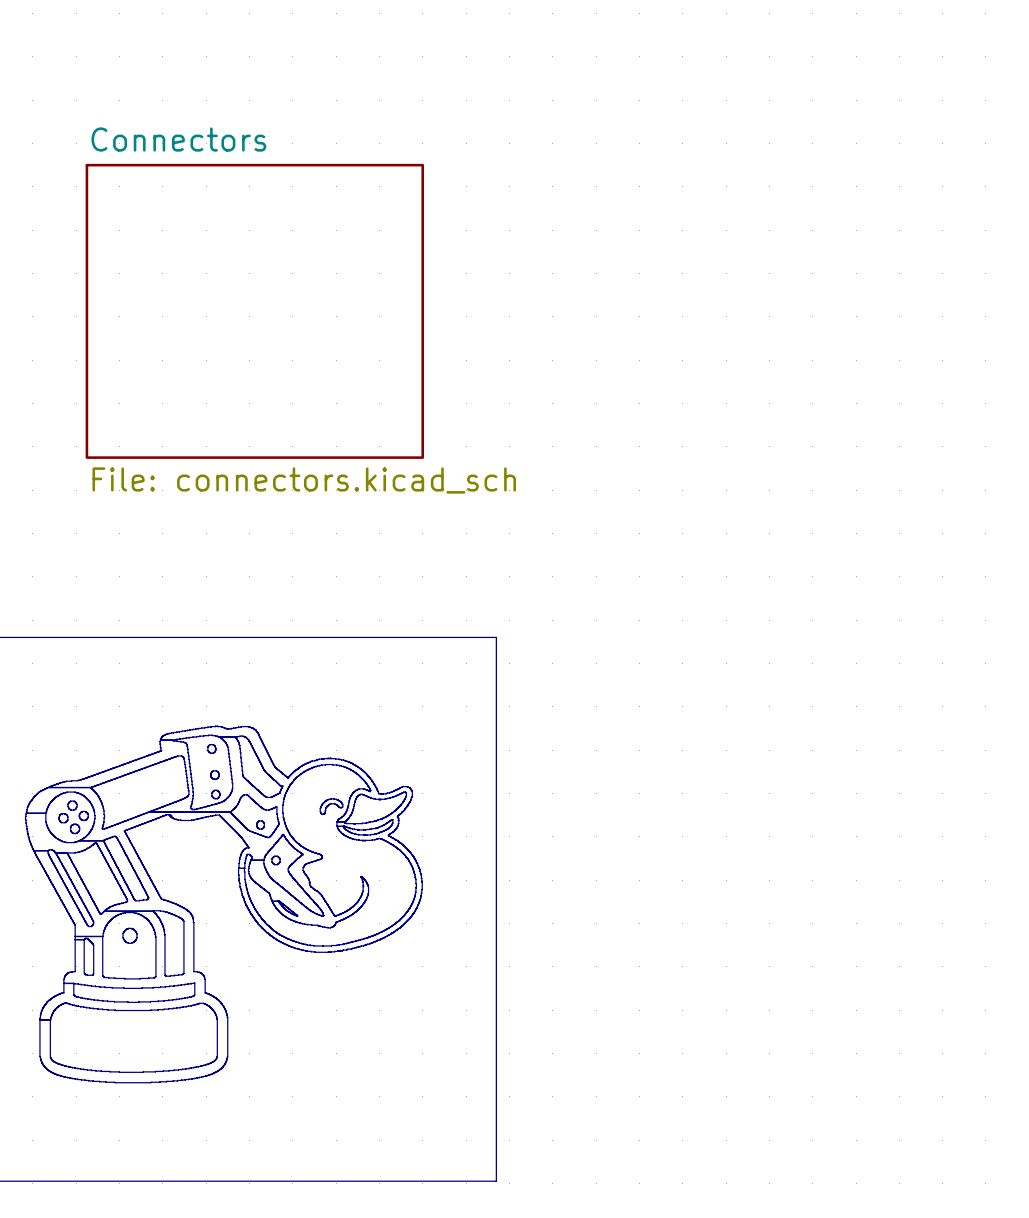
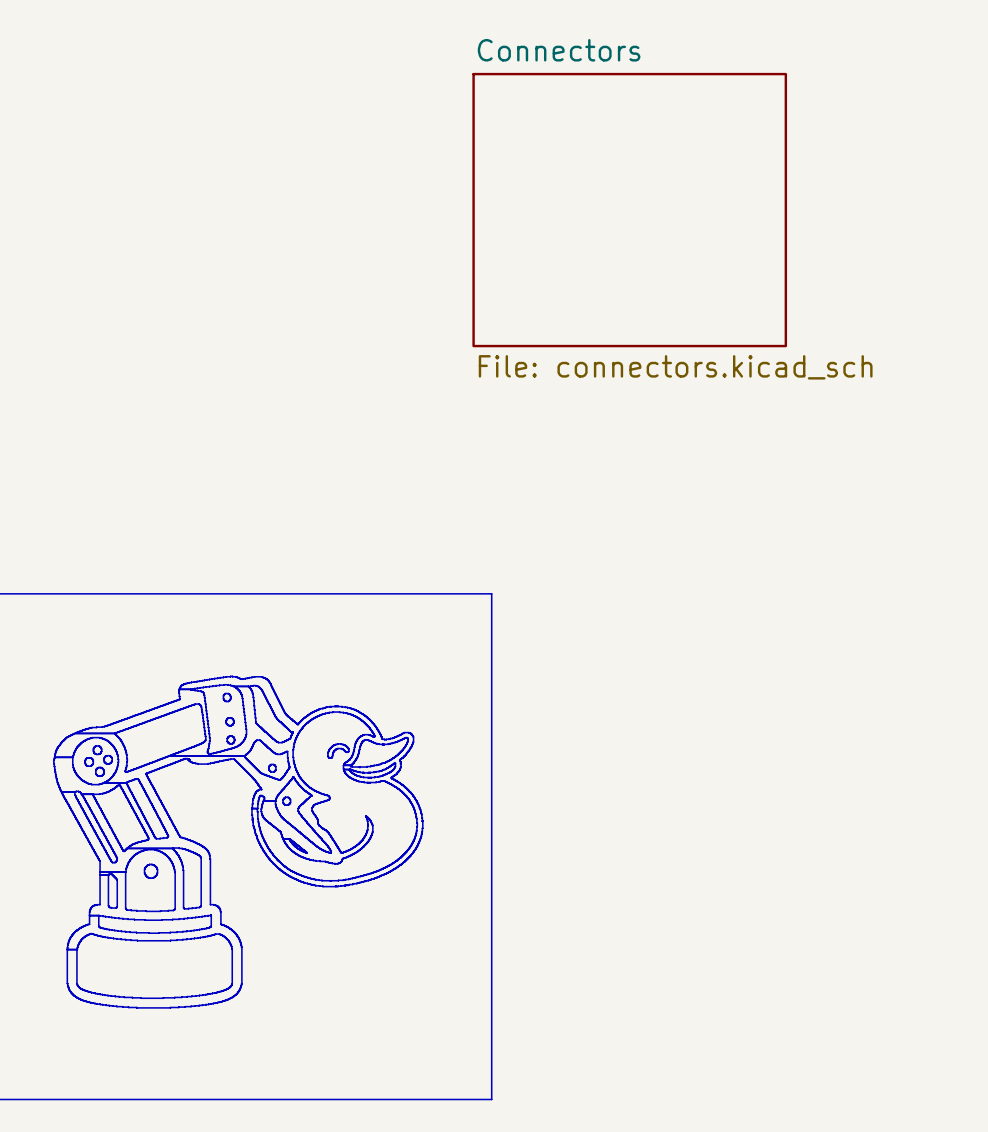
sheet Connectors position: (254, 311) -> (629, 210)

